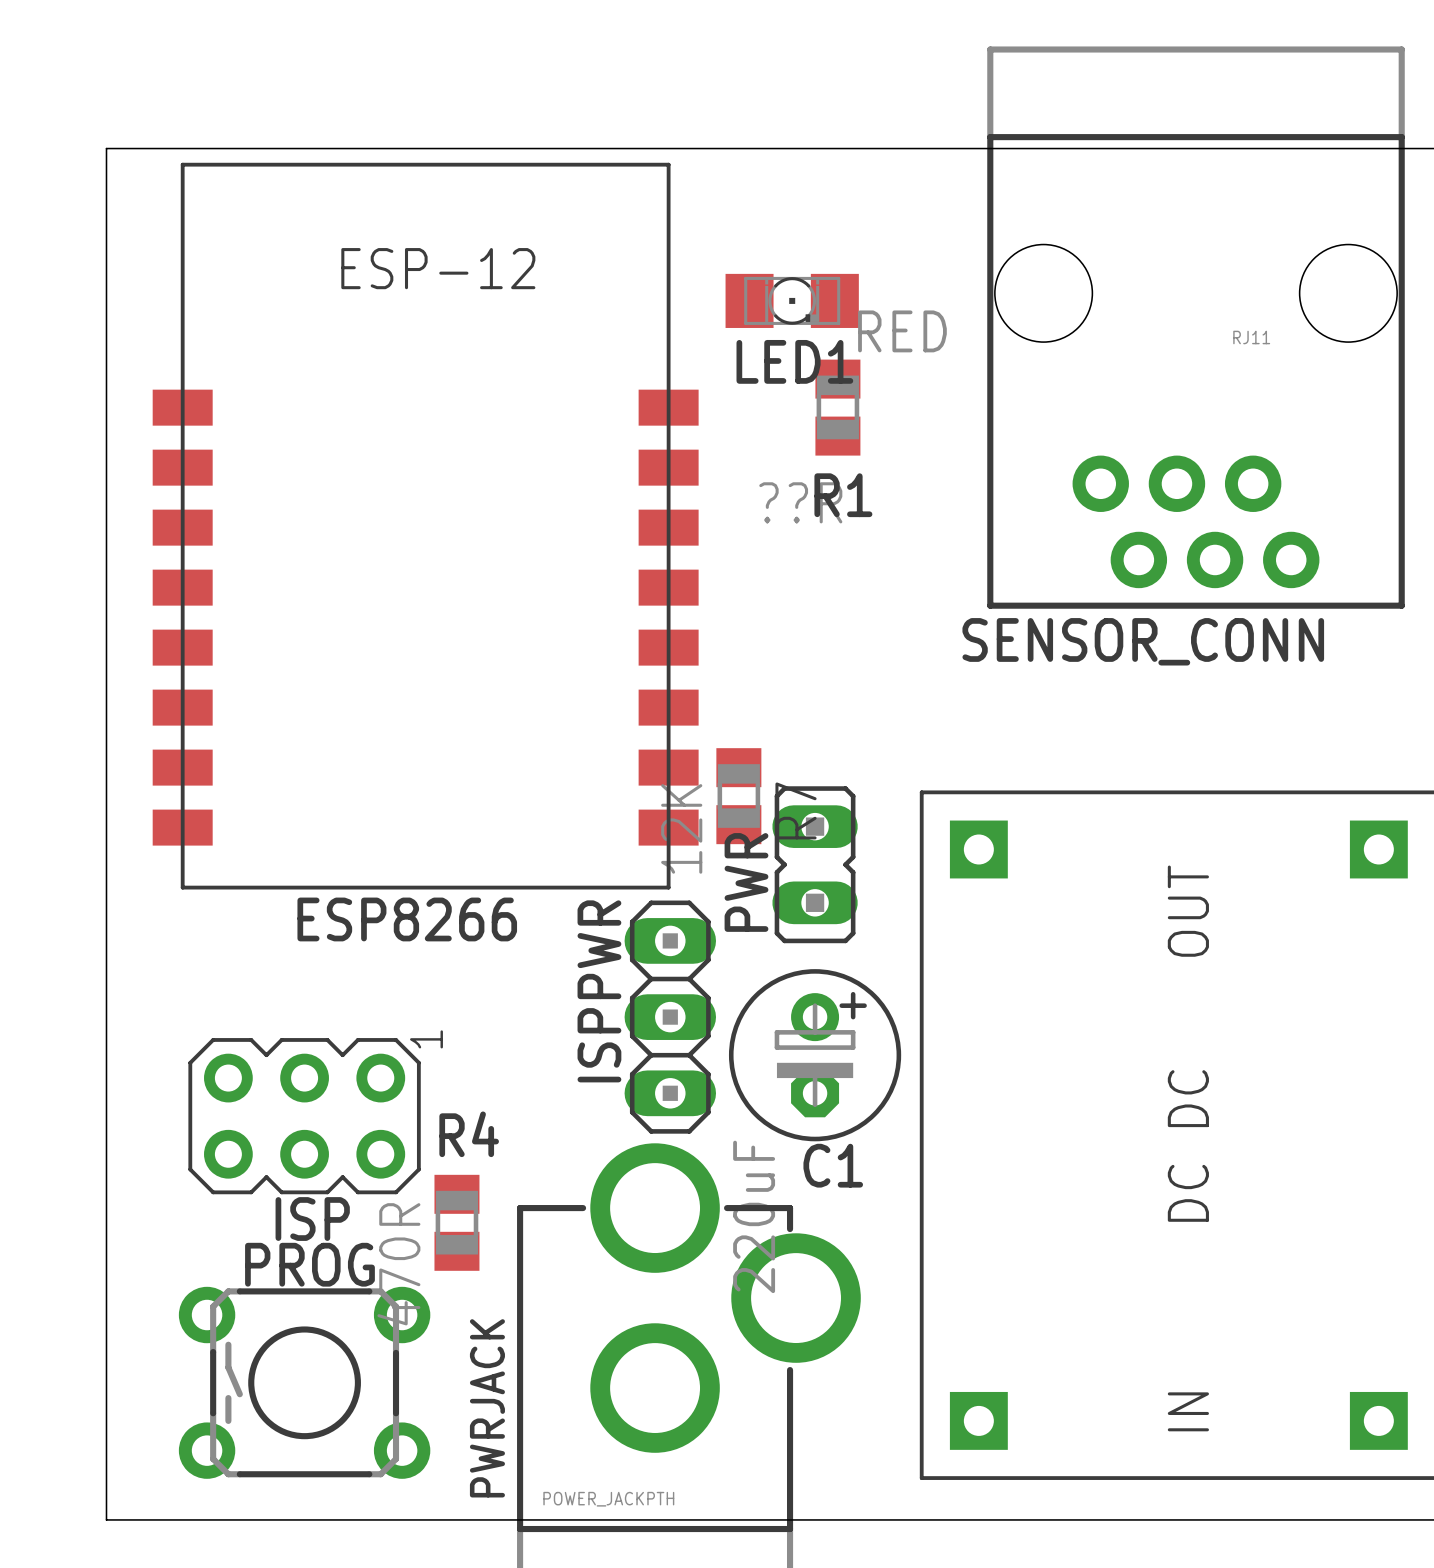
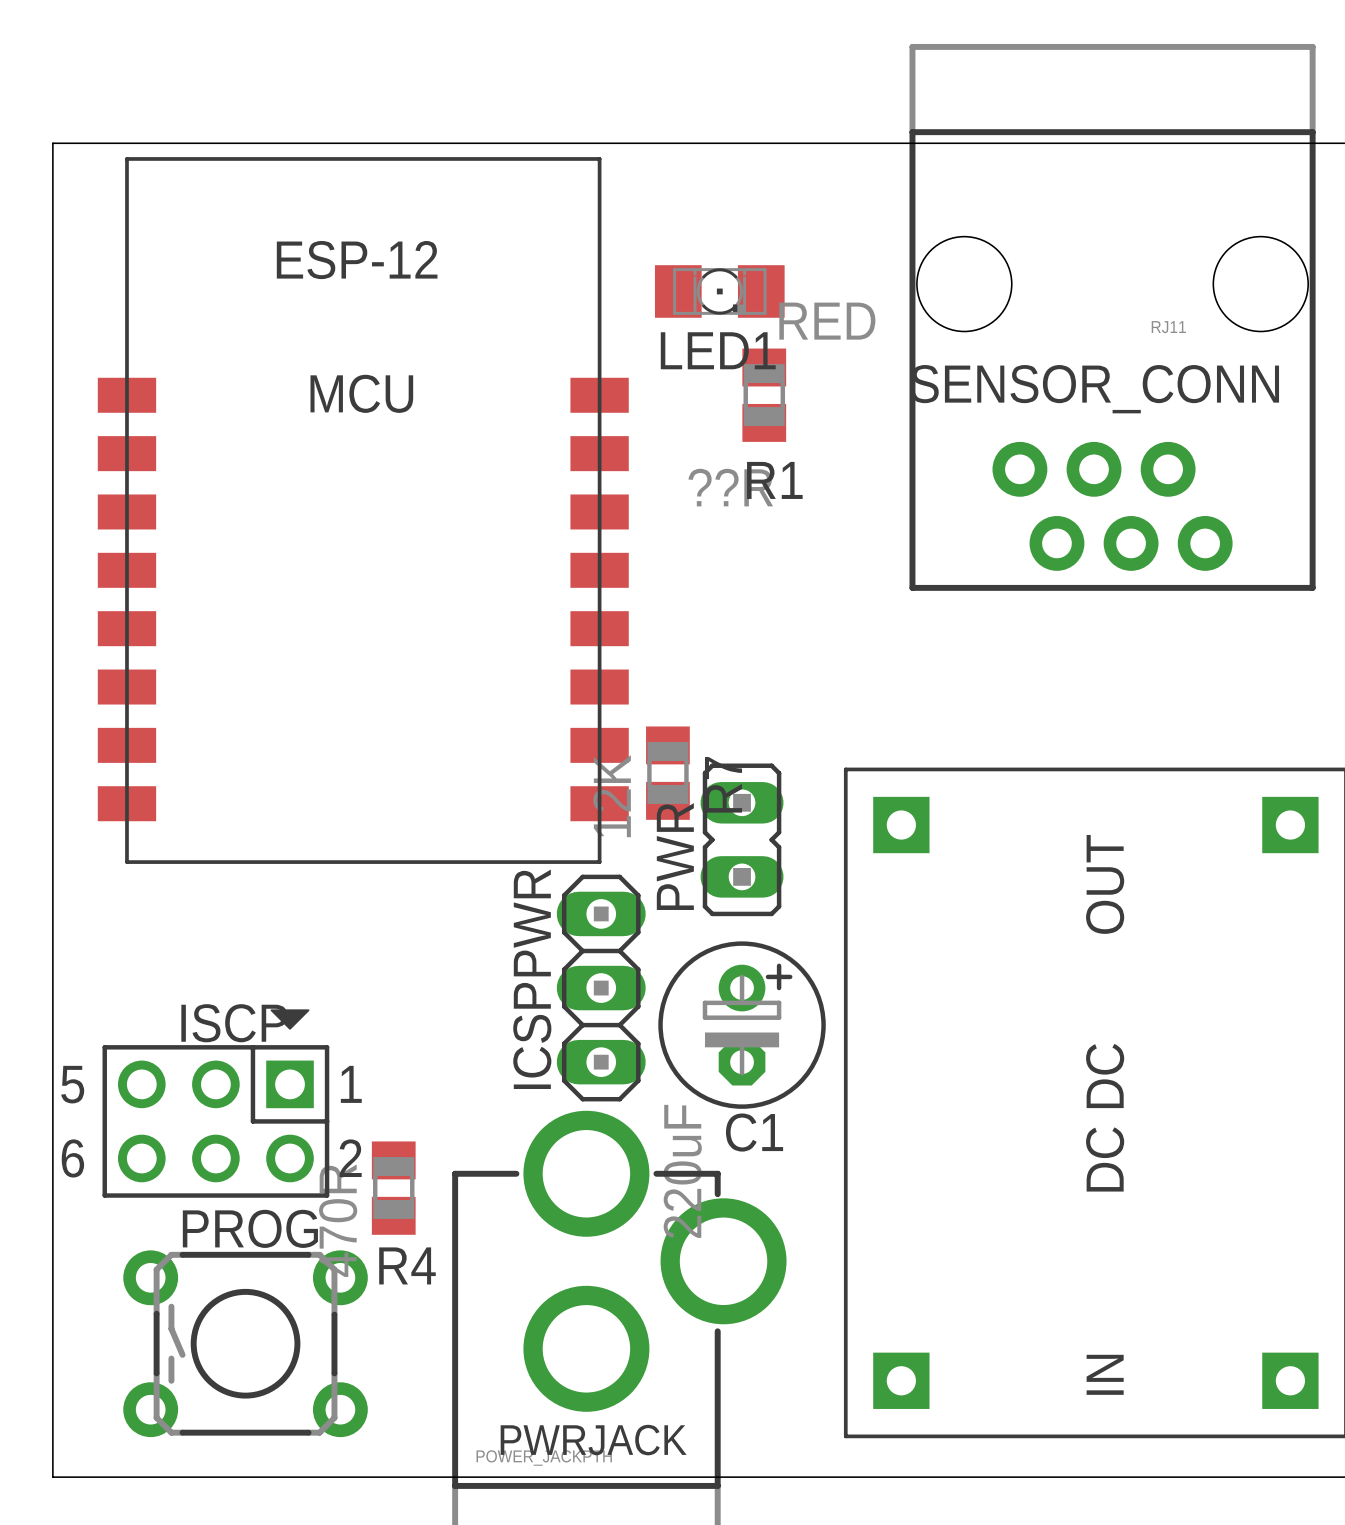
SENSOR_CONN name position: SENSOR_CONN (1143, 641) -> SENSOR_CONN (1094, 389)
ESP8266 name: ESP8266 (407, 919) -> MCU (361, 393)
ISPPWR name: ISPPWR (599, 991) -> ICSPPWR (532, 979)
ISP: (304, 1116) -> none
R4 name position: R4 (469, 1134) -> R4 (407, 1265)
ISCP: none -> (215, 1103)
PWRJACK name rotation: 0° (487, 1408) -> 90° clockwise (593, 1440)

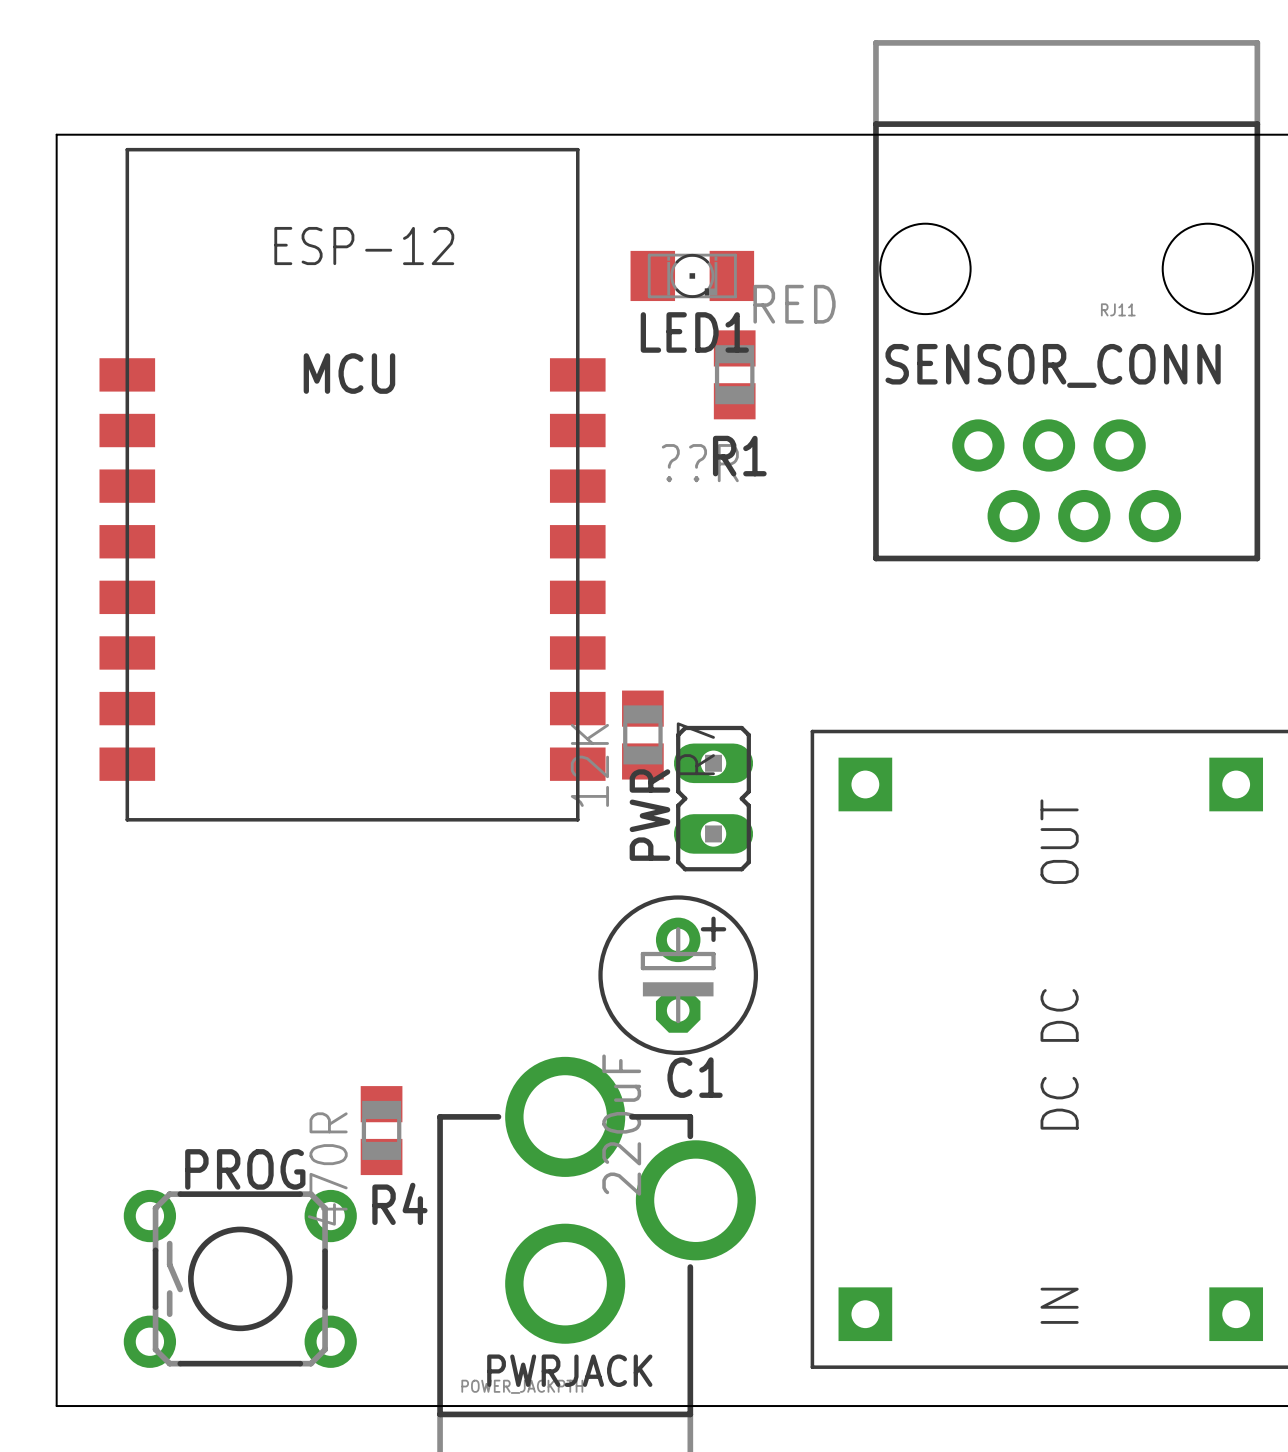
ICSPPWR: (601, 988) -> none
C1 position: (742, 1025) -> (678, 975)
ISCP: (215, 1103) -> none

